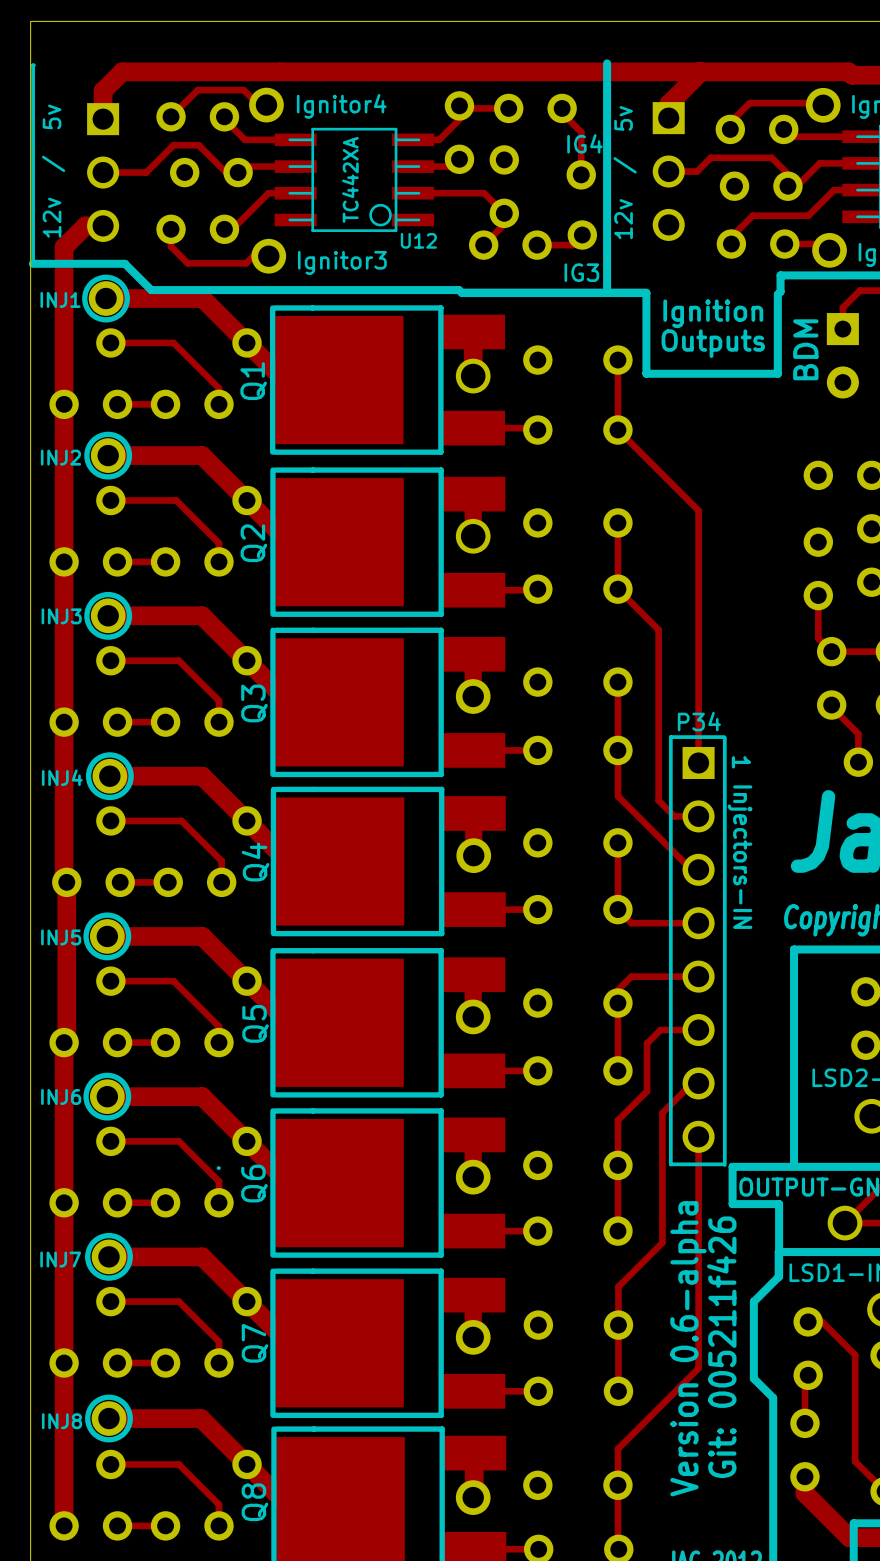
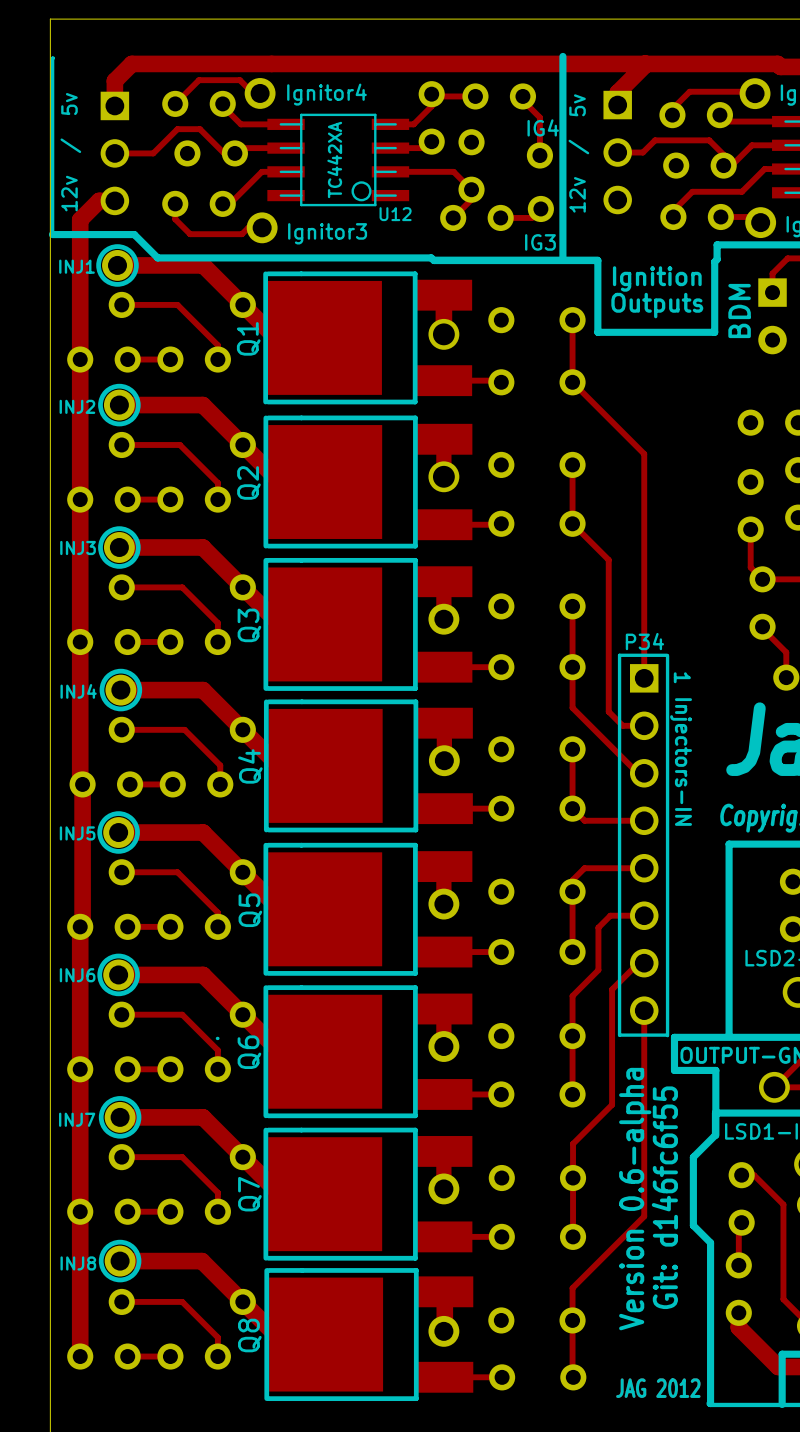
text: Git: 005211f426 (721, 1347) -> Git: d146fc6f55 (664, 1197)

